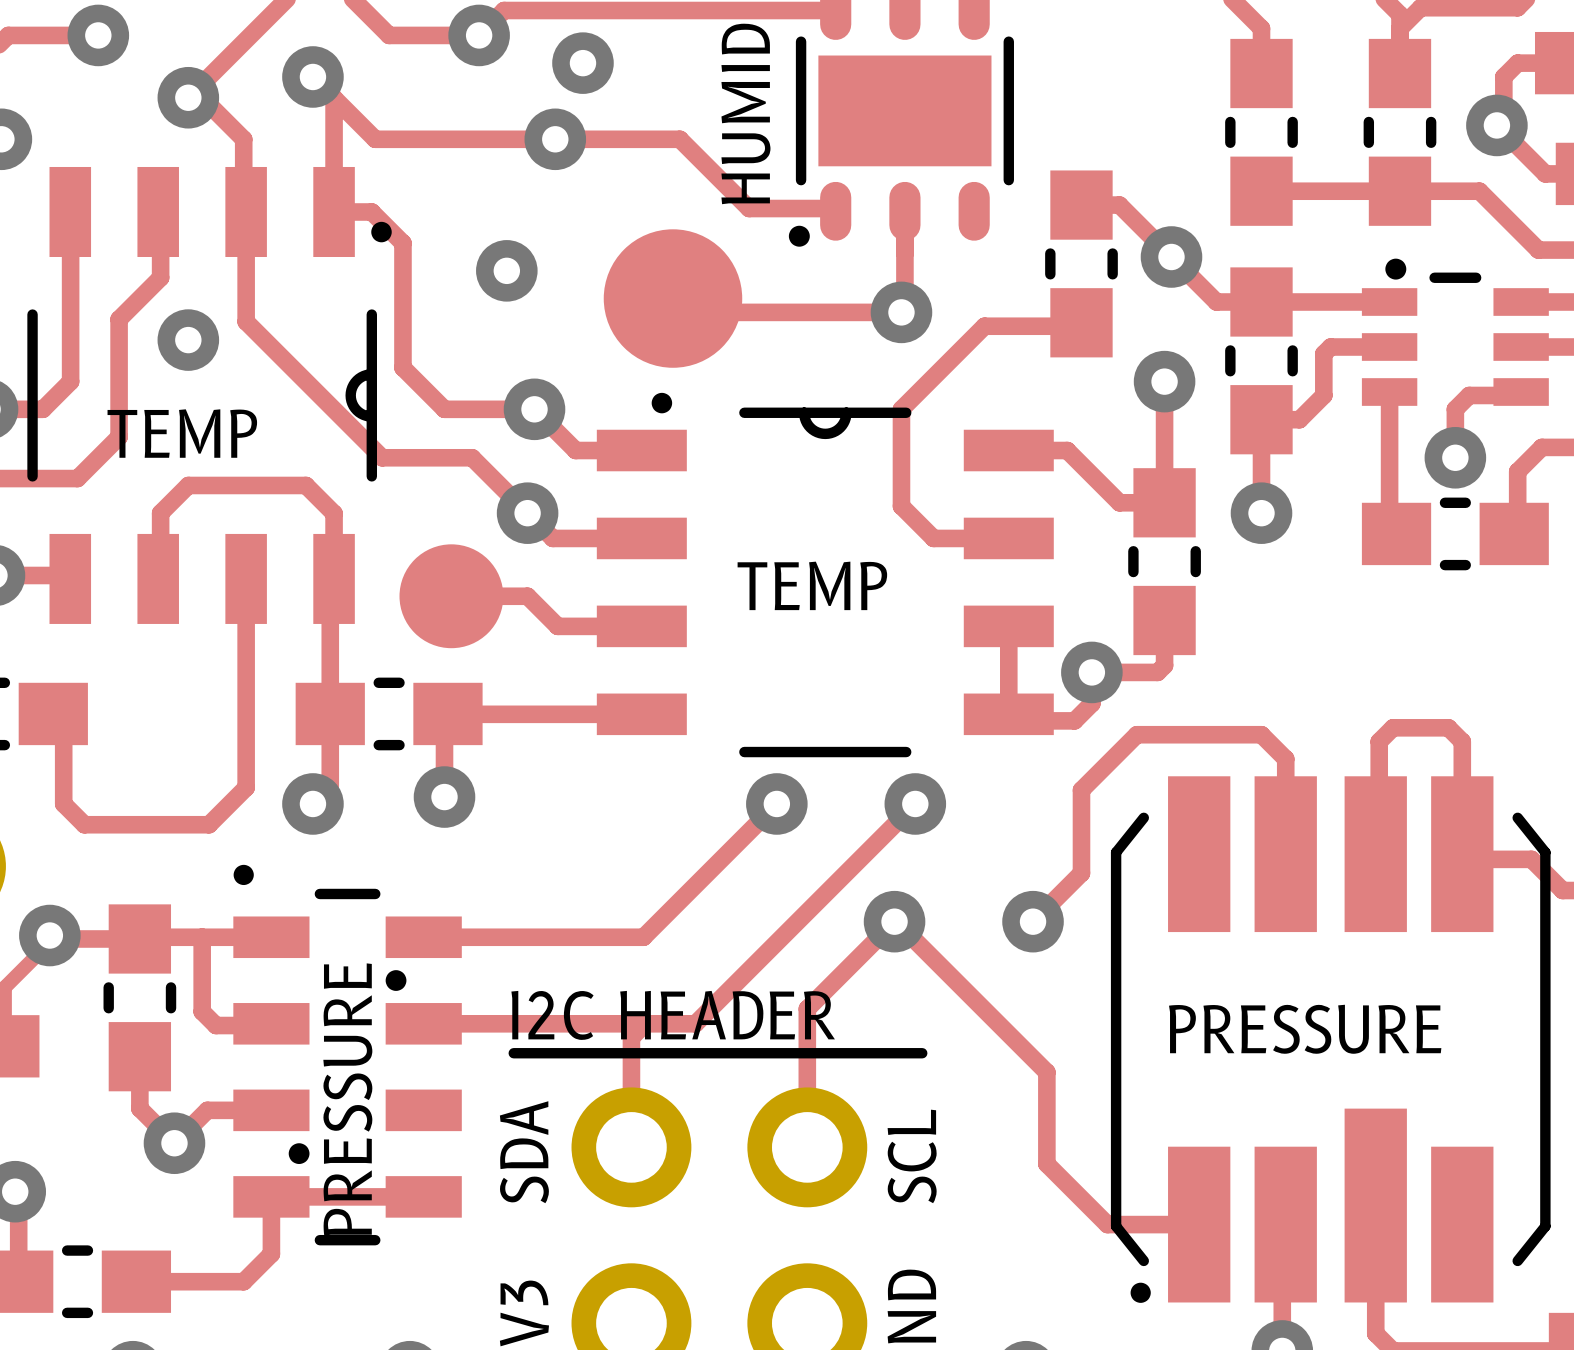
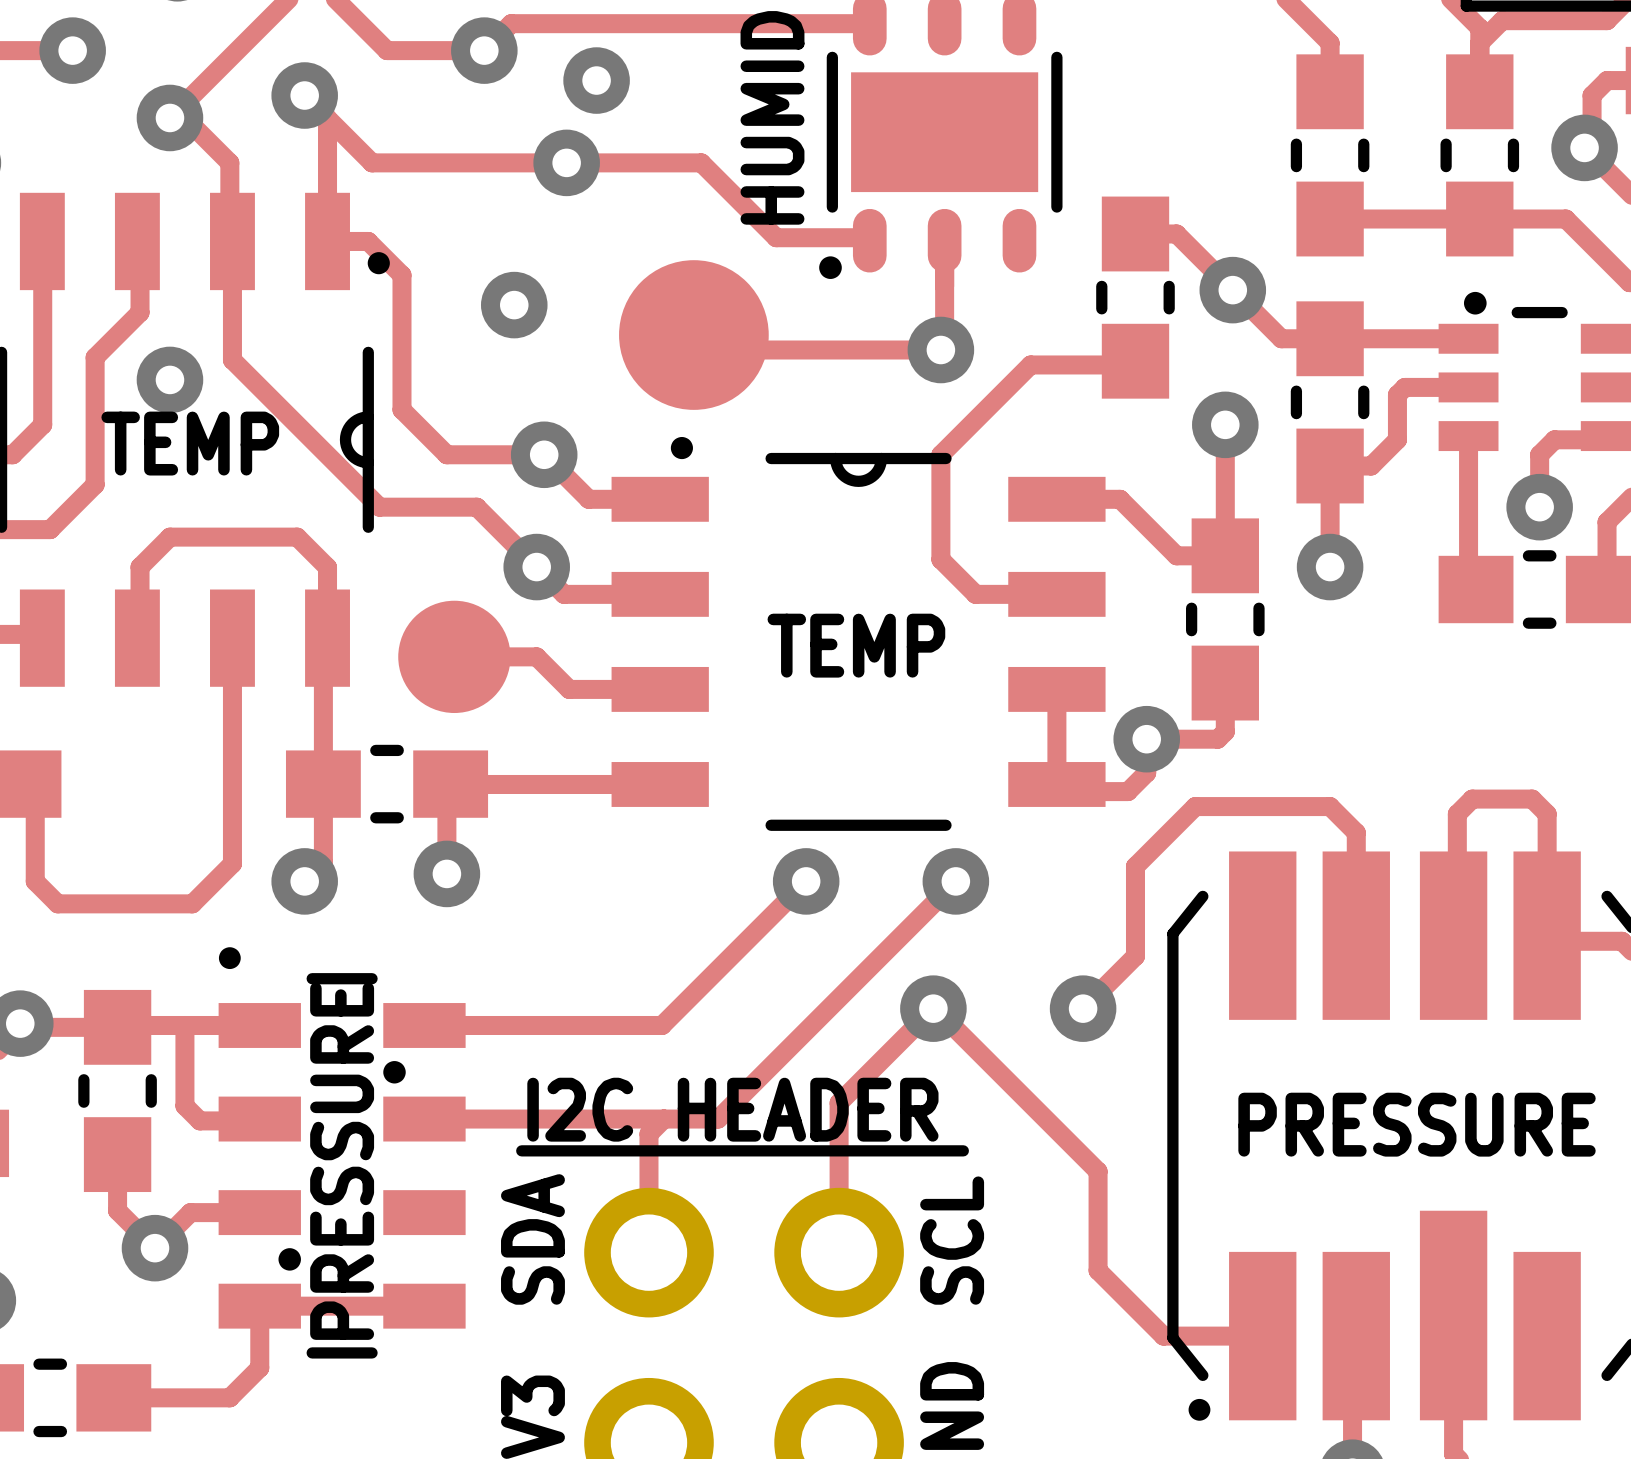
text position: TEMP (182, 433) -> TEMP (190, 443)

